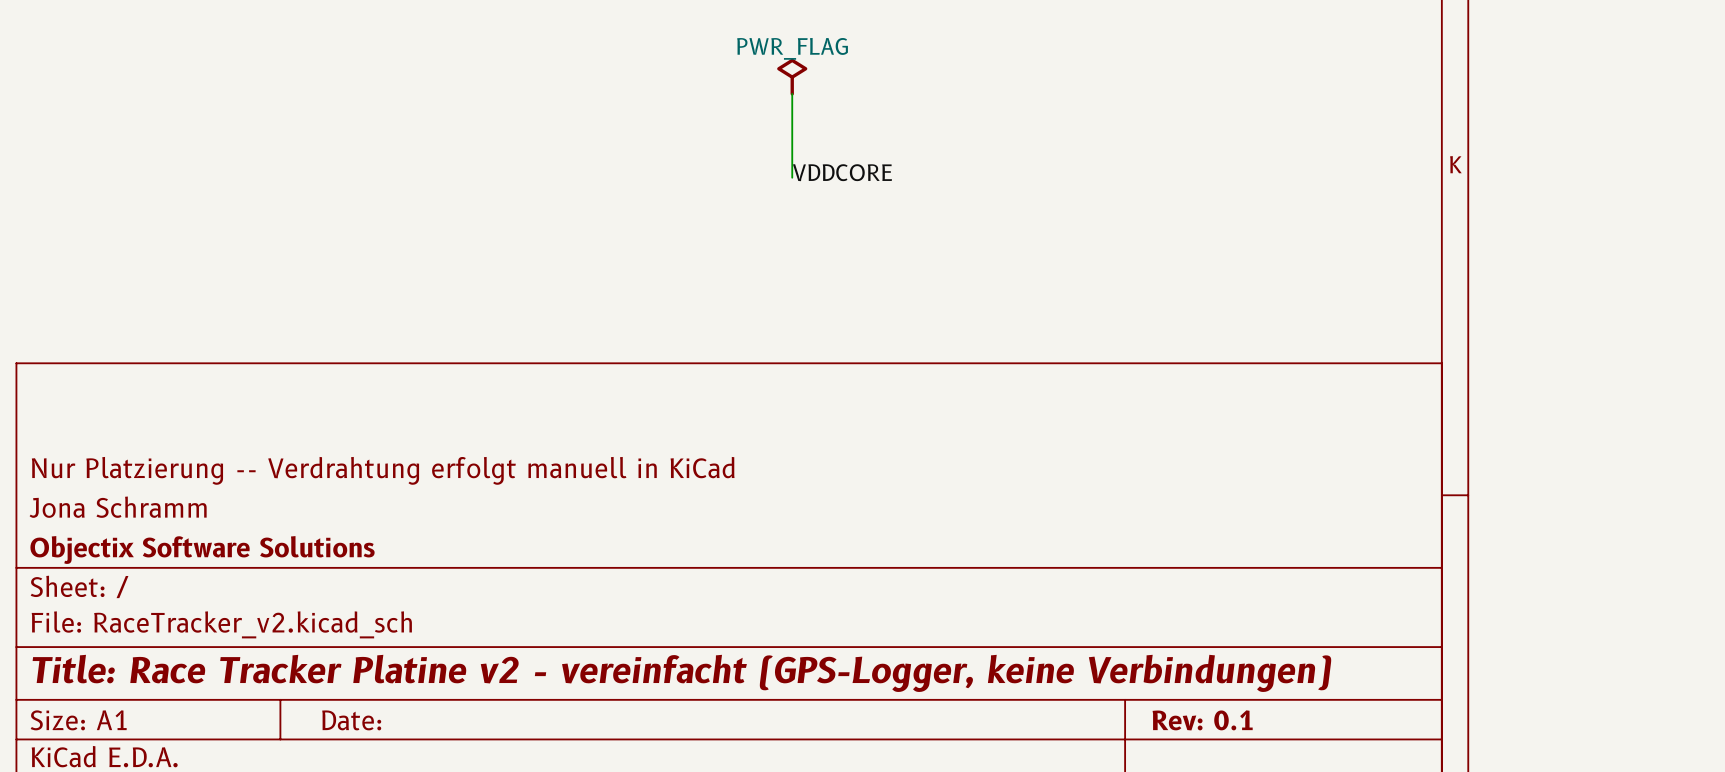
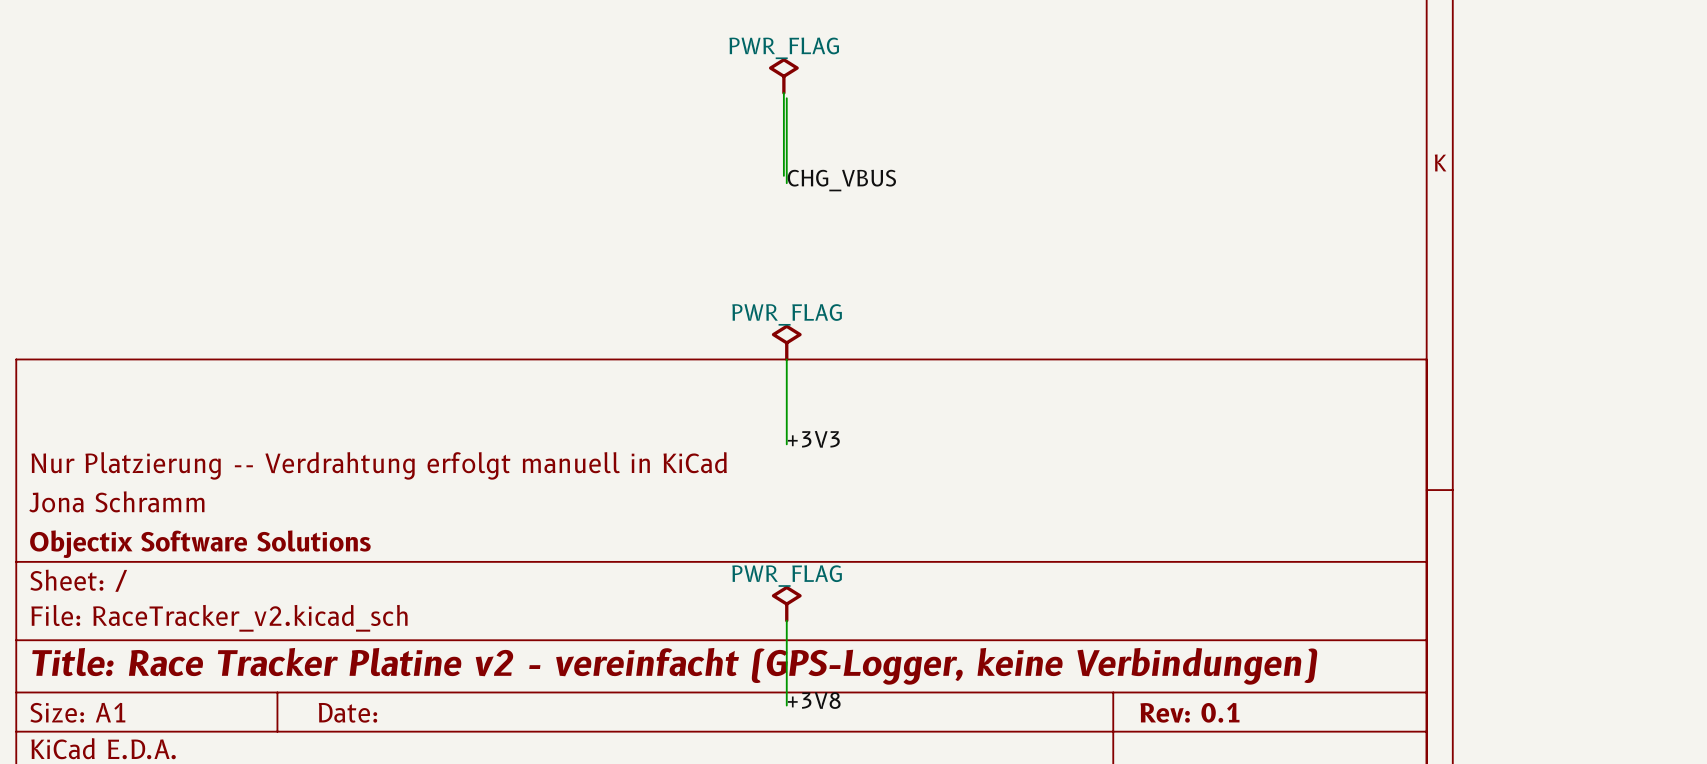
wire: none -> (786, 98) (786, 183)
label: VDDCORE (842, 172) -> CHG_VBUS (841, 180)
power symbol: none -> PWR_FLAG (786, 342)
wire: none -> (786, 359) (786, 444)
label: none -> +3V3 (813, 439)
power symbol: none -> PWR_FLAG (786, 604)
wire: none -> (786, 620) (786, 705)
label: none -> +3V8 (814, 700)

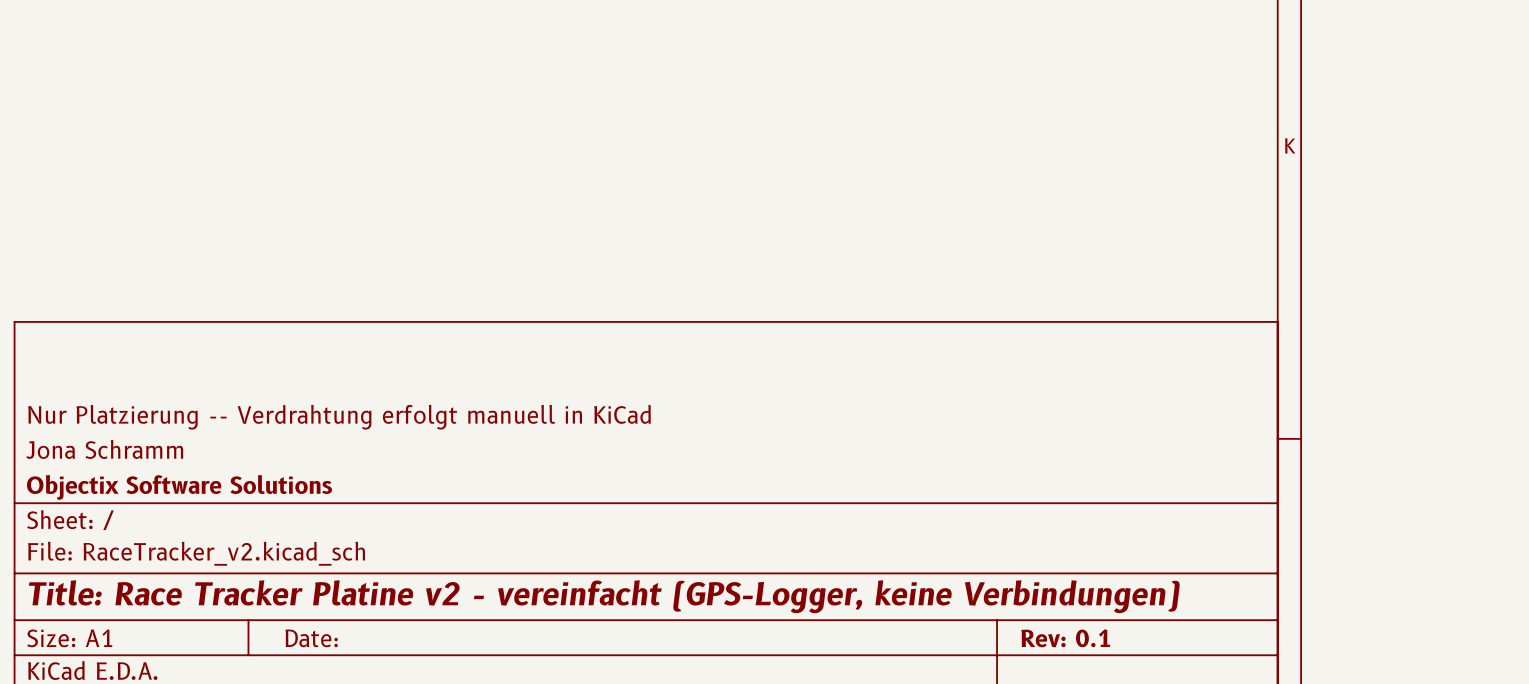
power symbol: PWR_FLAG (783, 76) -> none
wire: (783, 92) (783, 175) -> none
wire: (786, 98) (786, 183) -> none
label: CHG_VBUS (841, 180) -> none
power symbol: PWR_FLAG (786, 342) -> none
wire: (786, 359) (786, 444) -> none
label: +3V3 (813, 439) -> none
power symbol: PWR_FLAG (786, 604) -> none
wire: (786, 620) (786, 705) -> none
label: +3V8 (814, 700) -> none

